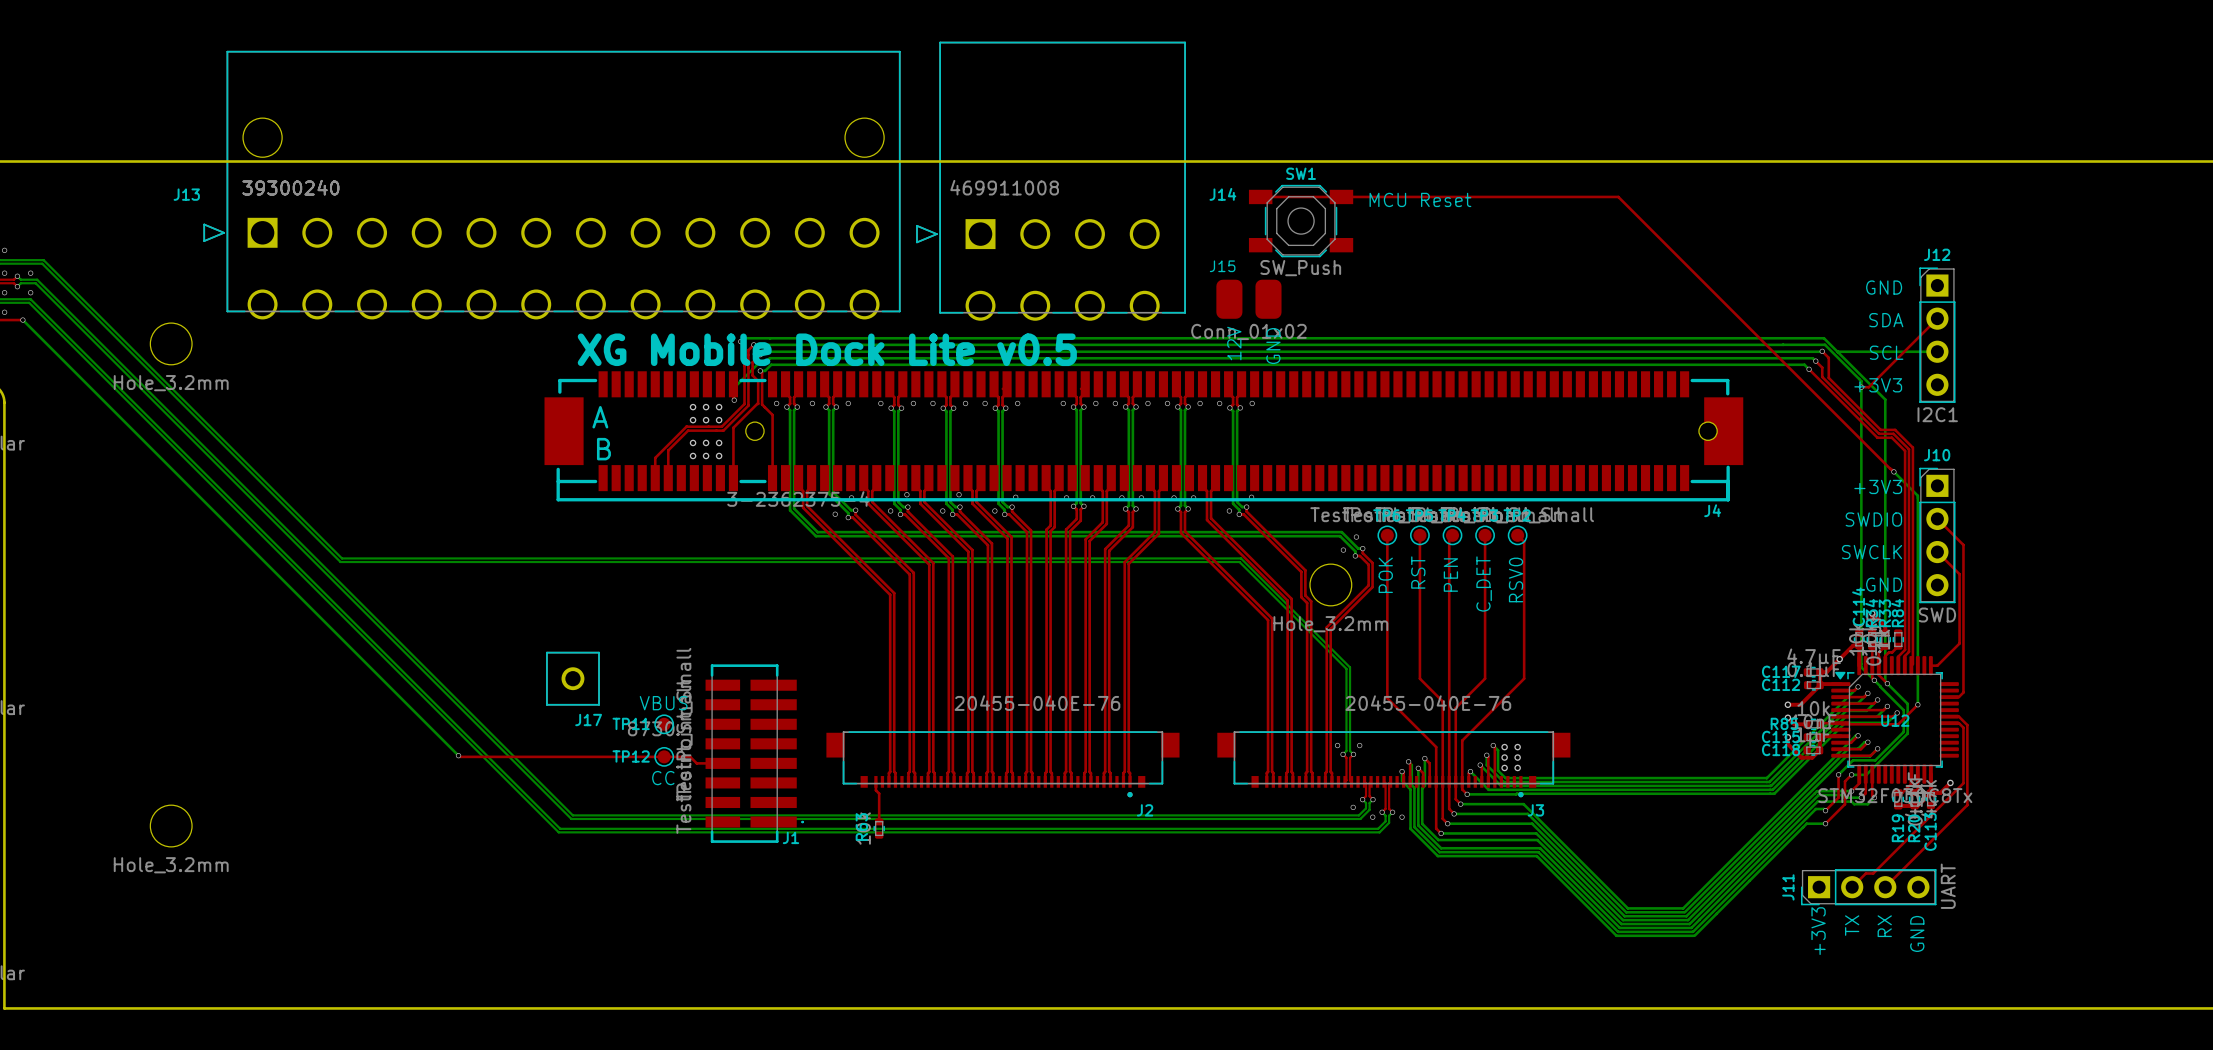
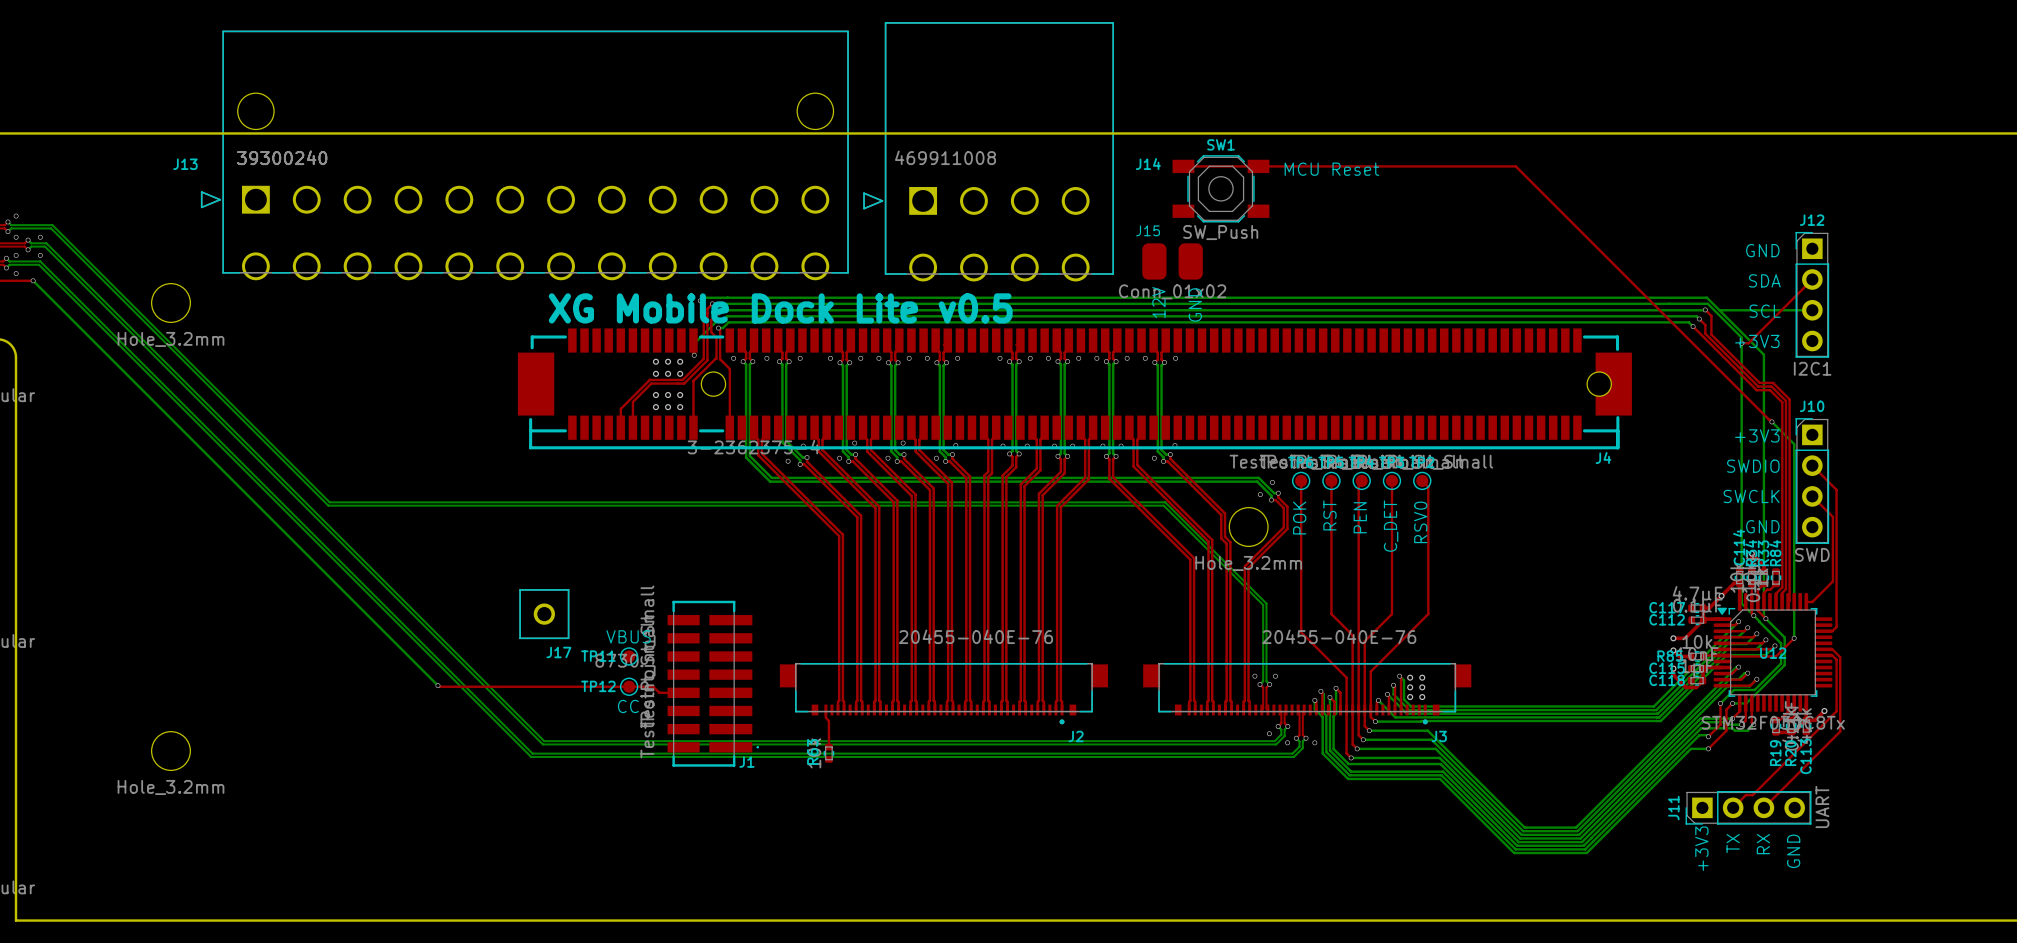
J4 footprint: [544, 371, 1744, 502] -> [517, 328, 1632, 450]

